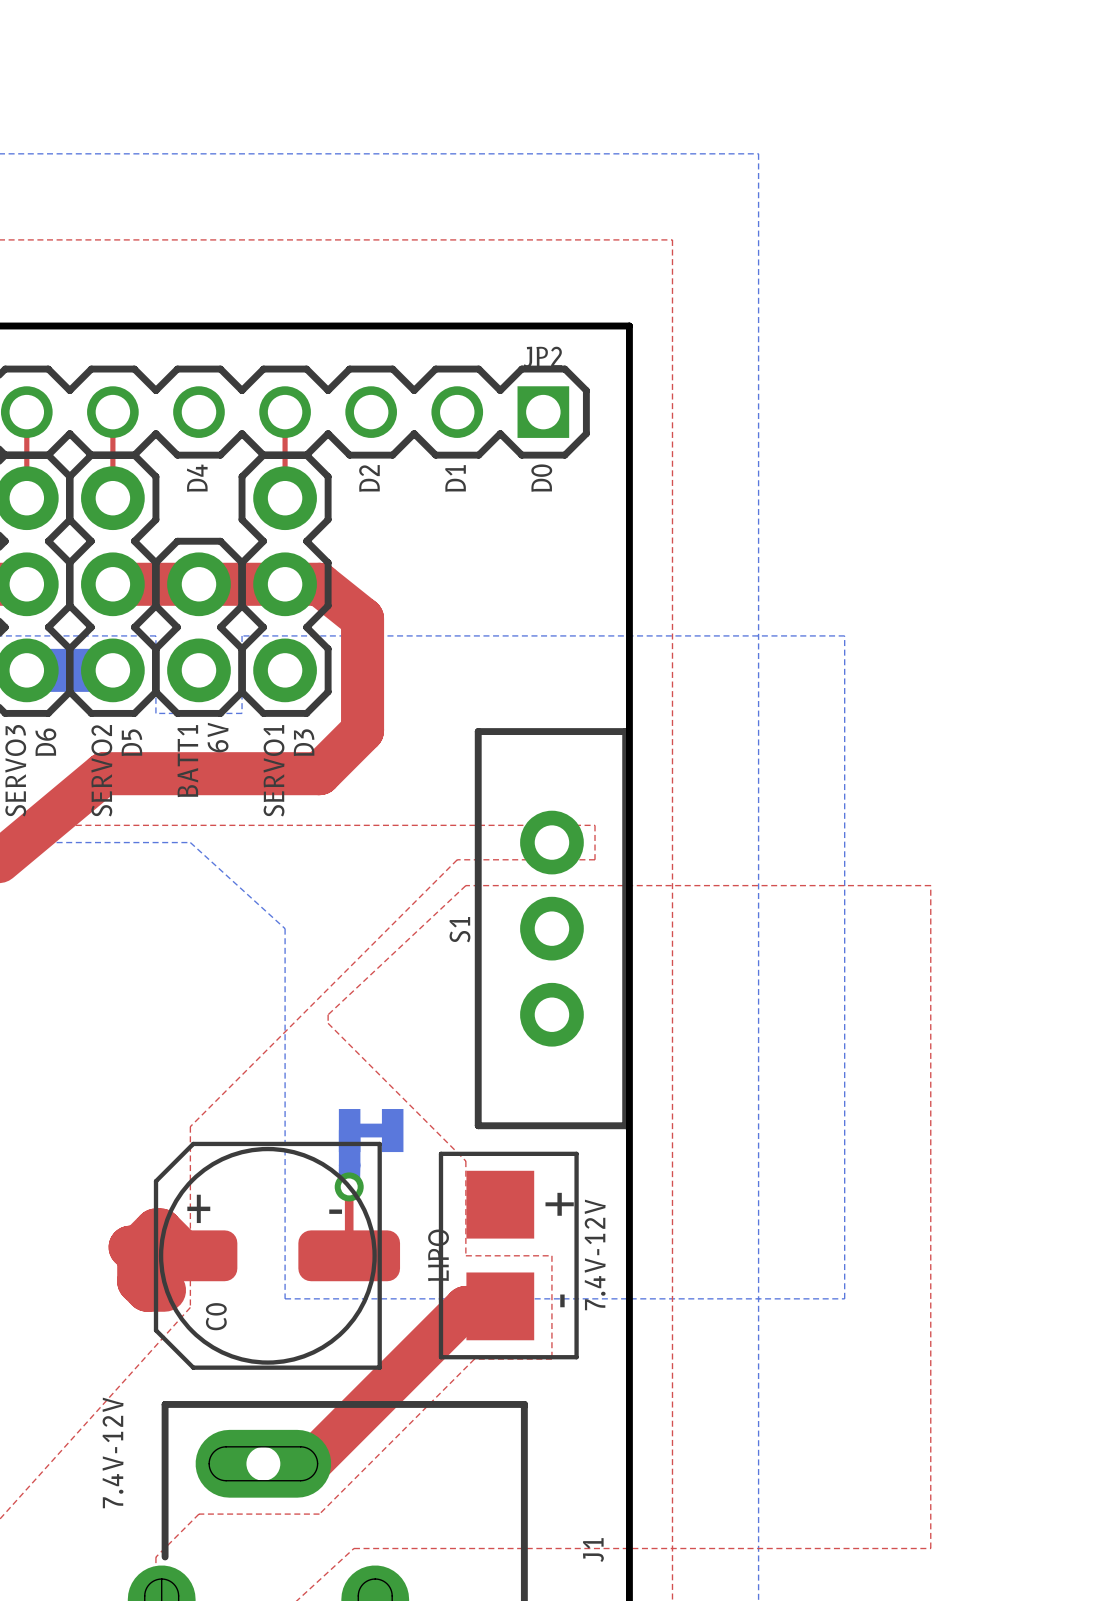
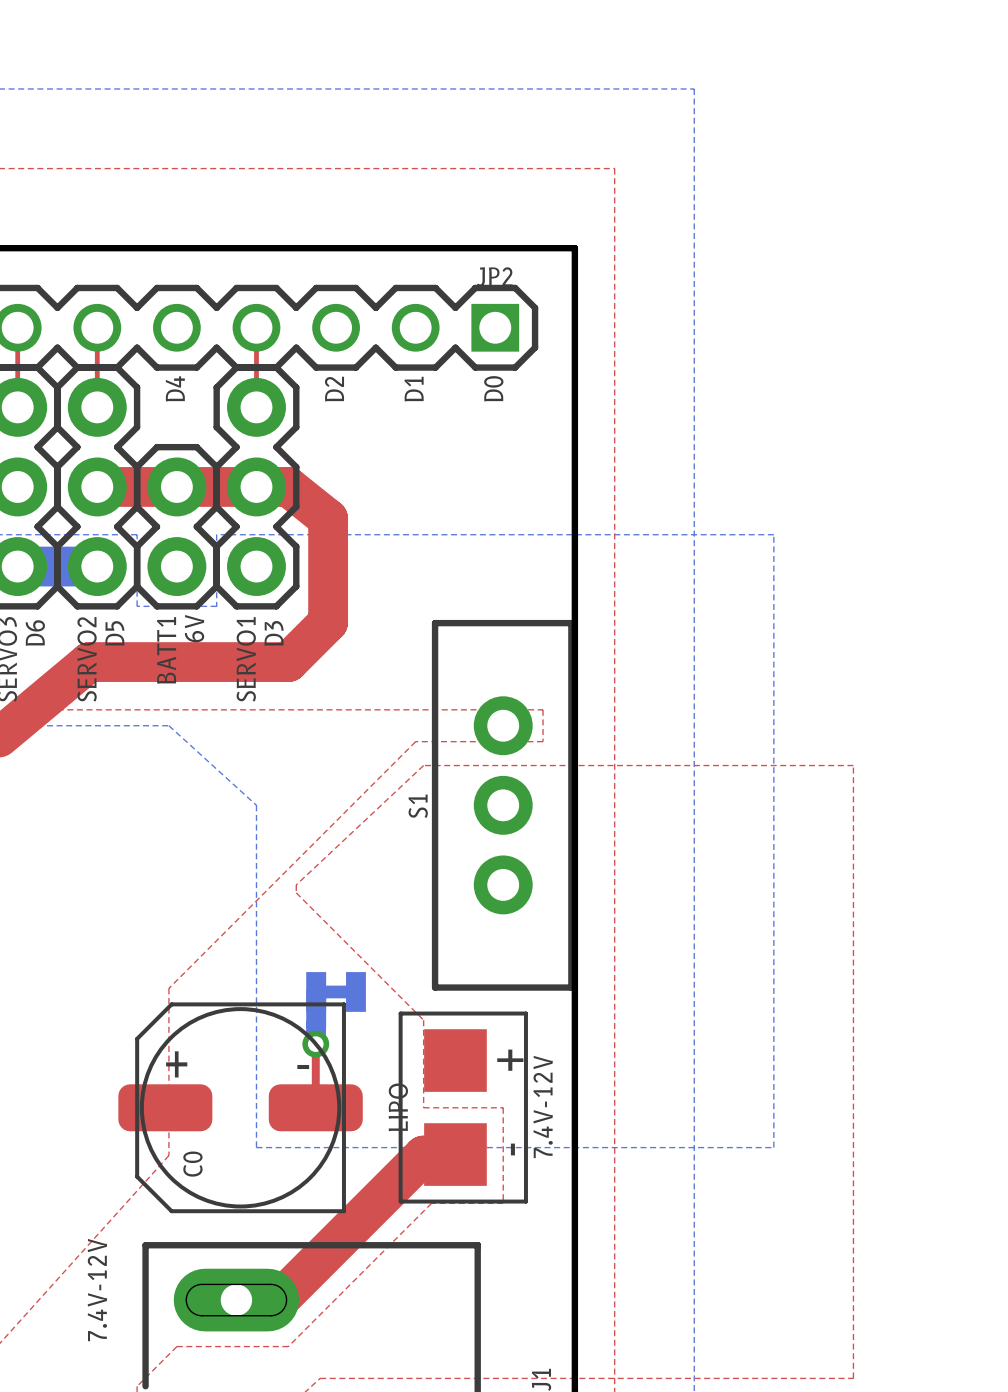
top track: (186, 1255) (160, 1229) (155, 1229) (138, 1247) (130, 1247) (138, 1255) (138, 1281) (147, 1290) (164, 1290) -> none

